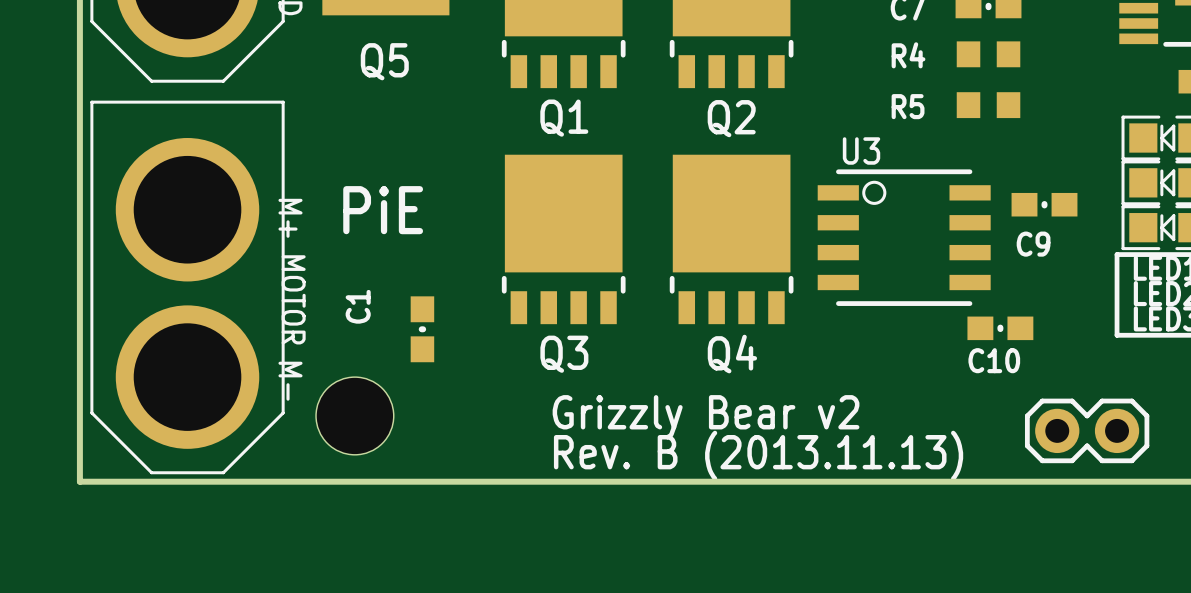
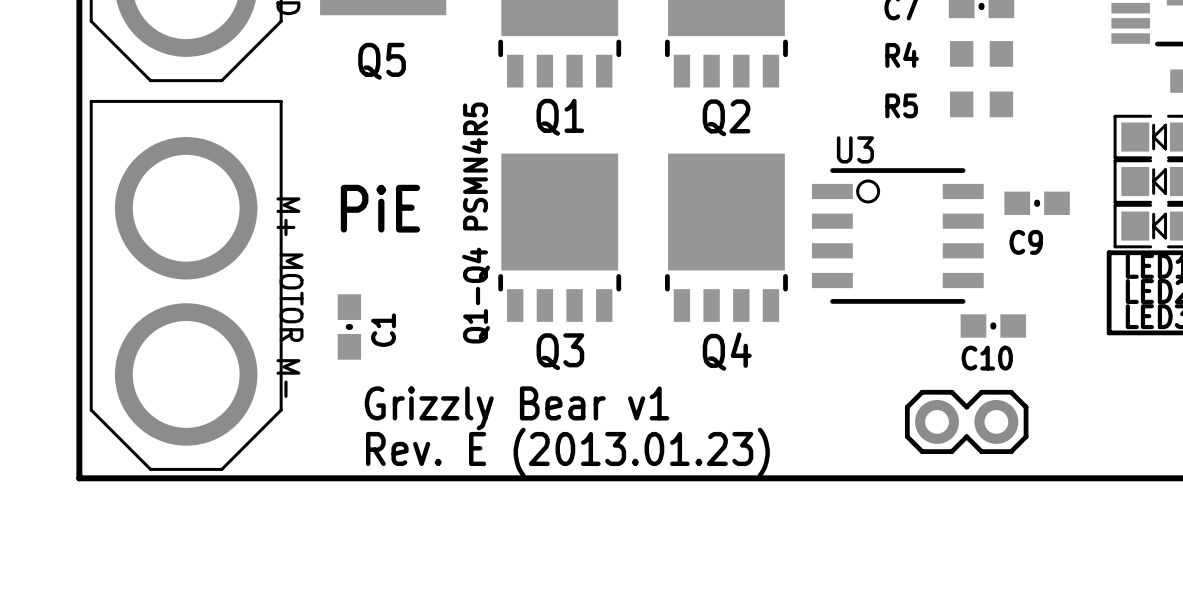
text: none -> Q1-Q4 PSMN4R5 (476, 223)
C1 name position: C1 (358, 306) -> C1 (383, 330)
C1 position: (422, 329) -> (349, 326)
part: (354, 415) -> none
text: Grizzly Bear v2 (706, 417) -> Grizzly Bear v1 (517, 408)
part position: (1087, 430) -> (966, 421)
text: Rev. B (2013.11.13) (758, 455) -> Rev. E (2013.01.23) (567, 452)

